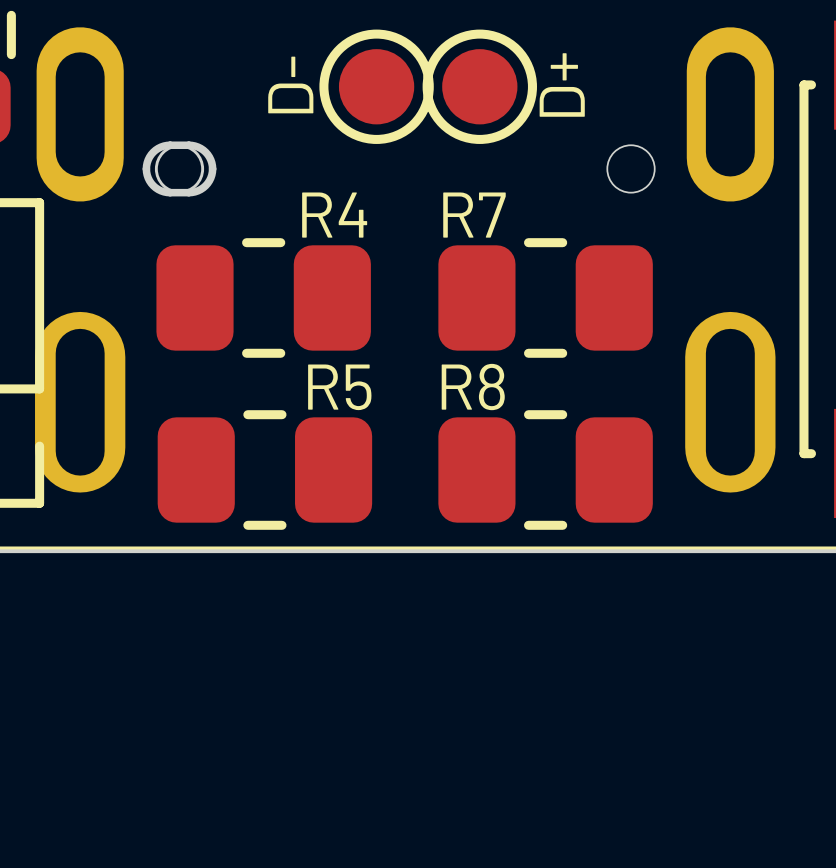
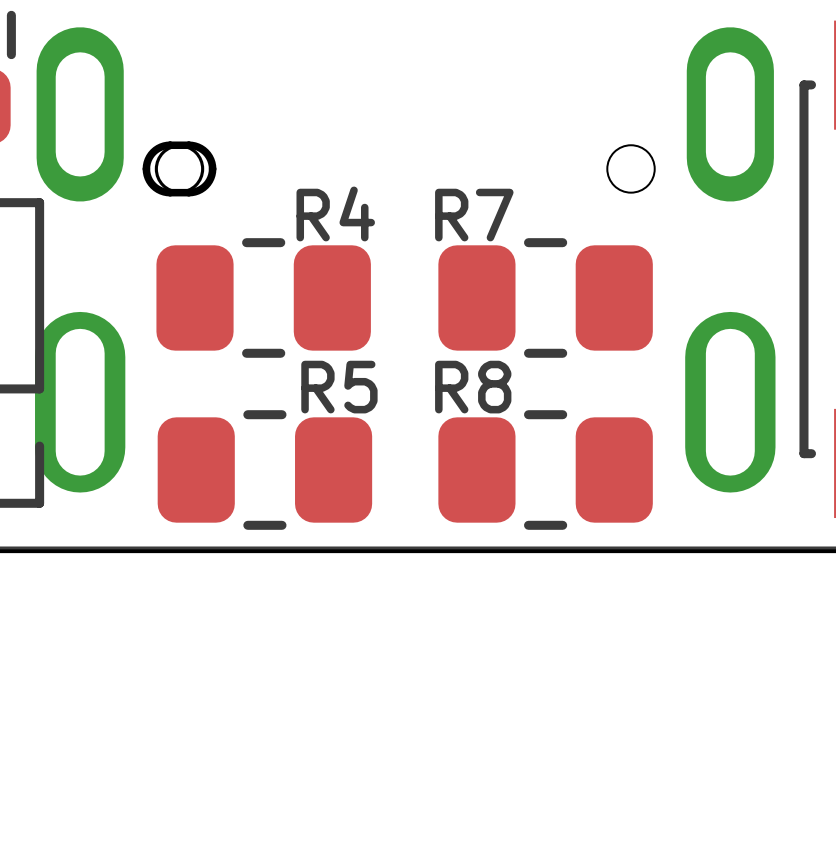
D-: (376, 86) -> none
D+: (479, 86) -> none

